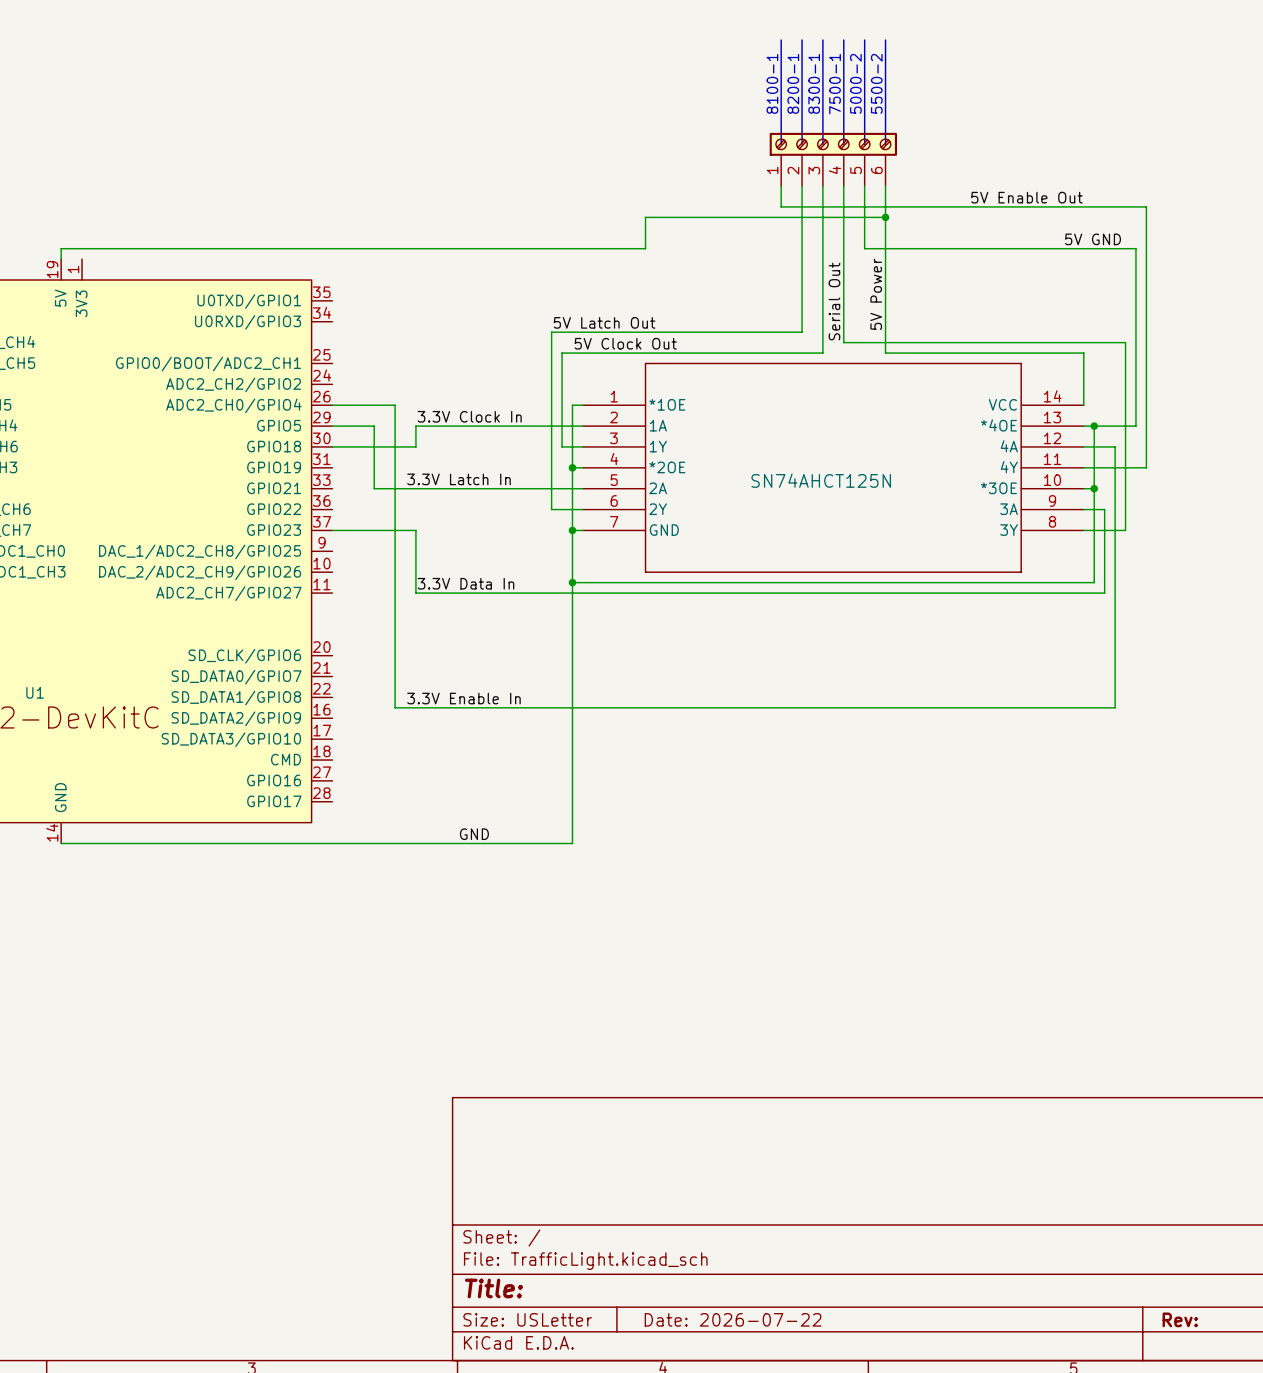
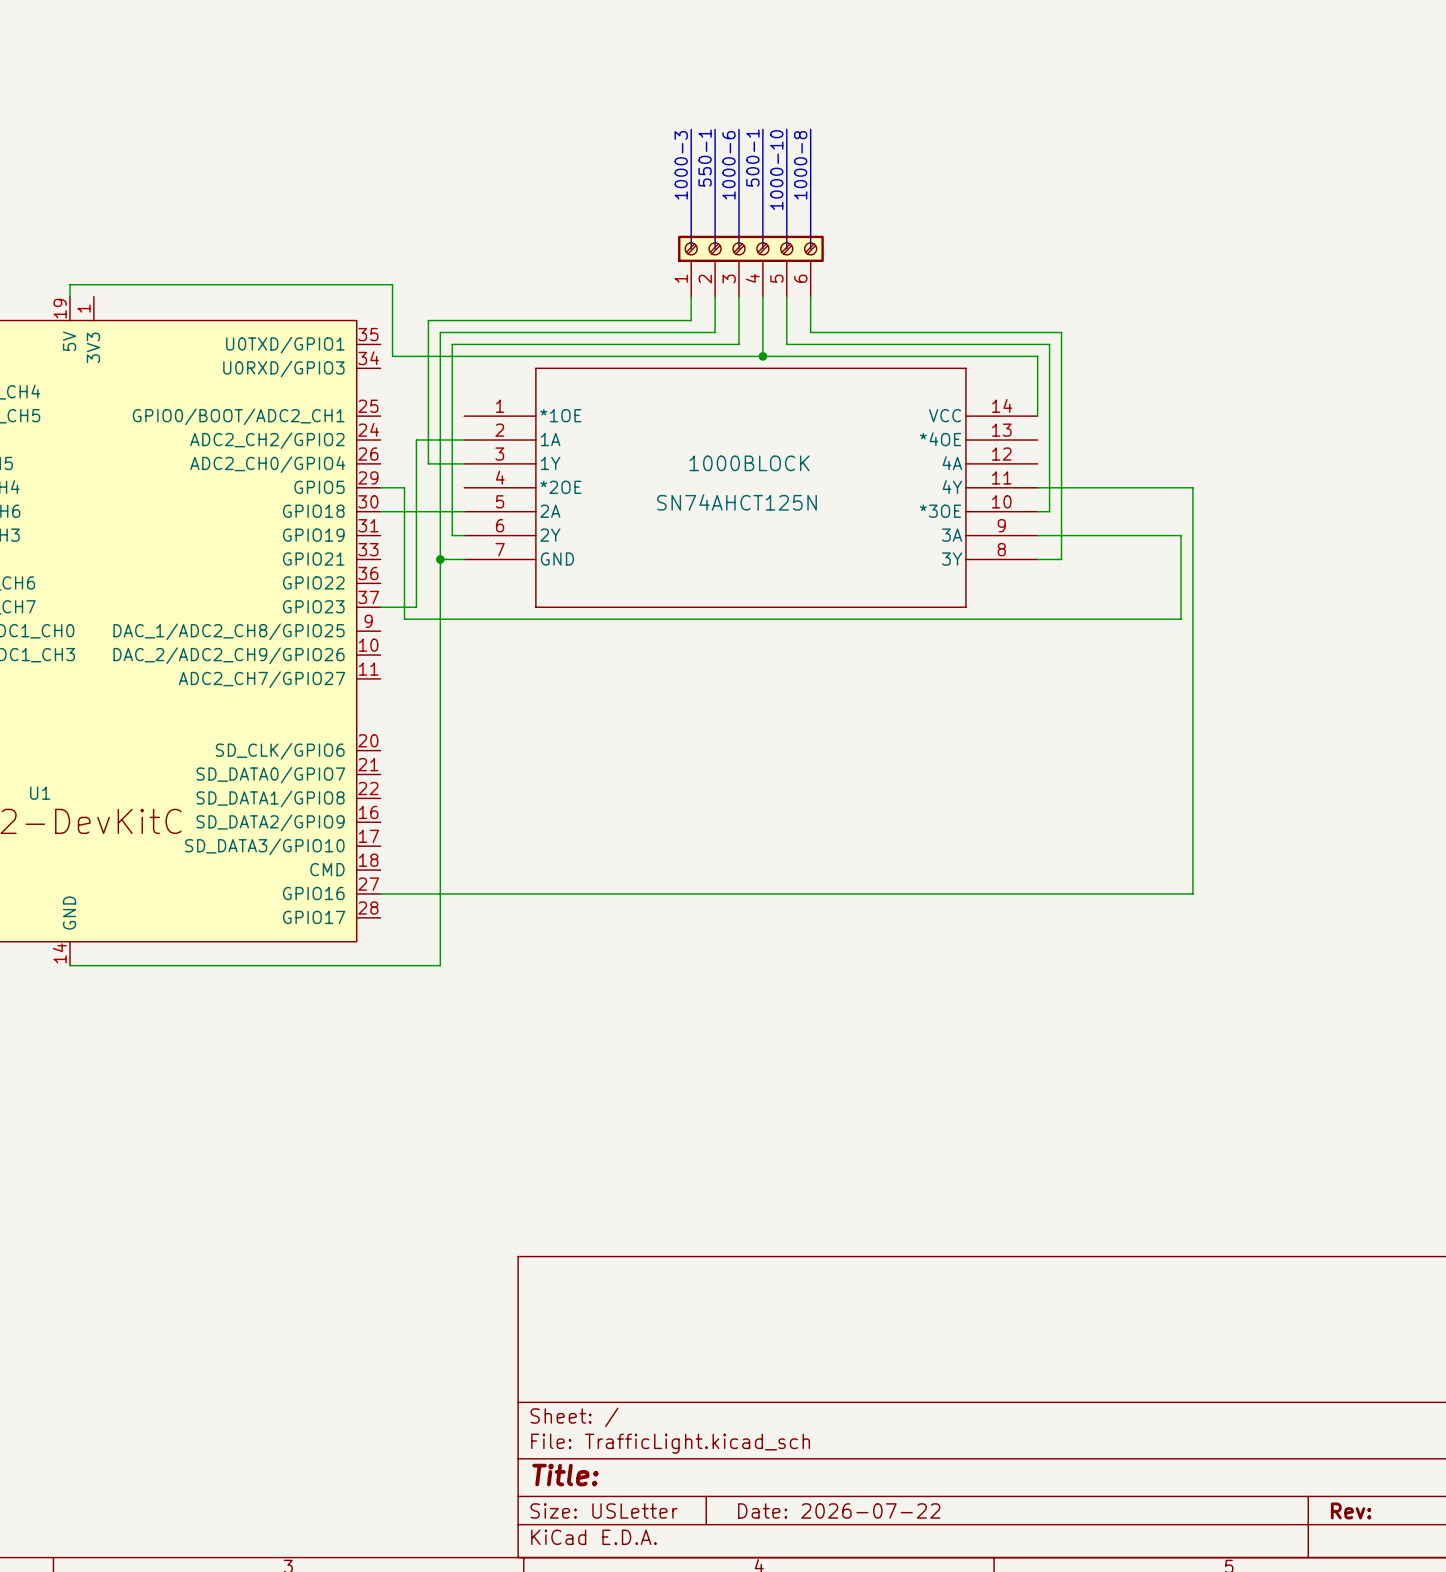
line: (781, 39) (781, 144) -> (691, 129) (691, 248)
line: (802, 39) (802, 144) -> (715, 129) (715, 248)
line: (822, 39) (822, 144) -> (738, 129) (738, 248)
line: (843, 39) (843, 144) -> (762, 129) (762, 248)
line: (864, 39) (864, 144) -> (786, 129) (786, 248)
line: (885, 39) (885, 144) -> (810, 129) (810, 248)
text: 8100-1 (772, 83) -> none
text: 8200-1 (793, 83) -> none
text: 8300-1 (814, 83) -> none
text: 5000-2 (855, 83) -> none
text: 5500-2 (876, 83) -> none
text: 7500-1 (835, 84) -> none
text: none -> 550-1 (705, 158)
text: none -> 500-1 (752, 158)
text: none -> 1000-3 (681, 165)
text: none -> 1000-6 (728, 165)
text: none -> 1000-8 (800, 165)
text: none -> 1000-10 (776, 170)
part position: (833, 159) -> (750, 266)
wire: (781, 186) (781, 206) (1146, 206) (1146, 467) (1083, 467) -> none
wire: (802, 186) (802, 332) (551, 332) (551, 509) (582, 509) -> none
wire: (822, 186) (822, 353) (562, 353) (562, 446) (582, 446) -> none
wire: (843, 186) (843, 342) (1125, 342) (1125, 530) (1083, 530) -> none
wire: (864, 186) (864, 248) (1135, 248) (1135, 426) (1083, 426) -> none
wire: (885, 186) (885, 353) (1083, 353) (1083, 405) -> none
label: 5V Enable Out (1026, 197) -> none
wire: (885, 217) (645, 217) (645, 248) (342, 248) -> (1037, 416) (1037, 356) (392, 356) (392, 284)
junction: (885, 217) -> none
label: 5V GND (1093, 239) -> none
wire: none -> (738, 296) (738, 344) (452, 344) (452, 463) (464, 463)
wire: none -> (762, 296) (762, 356)
wire: none -> (786, 296) (786, 344) (1049, 344) (1049, 511) (1037, 511)
wire: none -> (810, 296) (810, 332) (1061, 332) (1061, 559) (1037, 559)
label: 5V Power (876, 294) -> none
label: Serial Out (834, 301) -> none
junction: none -> (762, 356)
label: 5V Latch Out (604, 322) -> none
label: 5V Clock Out (625, 343) -> none
wire: (332, 405) (374, 405) -> (691, 296) (691, 320) (428, 320) (428, 463)
wire: (582, 405) (572, 405) (572, 843) (384, 843) -> (715, 296) (715, 332) (440, 332) (440, 965)
label: 3.3V Clock In (469, 416) -> none
wire: (353, 426) (374, 426) (374, 488) (384, 488) -> (404, 487) (404, 619) (1180, 619) (1180, 535) (1037, 535)
wire: (582, 426) (415, 426) (415, 446) (405, 446) -> none
1000BLOCK: none -> SN74AHCT125N (750, 487)
wire: none -> (1037, 487) (1192, 487) (1192, 893) (380, 893)
wire: (1094, 426) (1094, 582) (572, 582) -> none
junction: (1094, 426) -> none
wire: (1083, 446) (1115, 446) (1115, 707) (395, 707) (395, 467) -> (464, 535) (452, 535)
wire: (572, 467) (582, 467) -> none
junction: (572, 467) -> none
part: SN74AHCT125N (833, 467) -> none
label: 3.3V Latch In (459, 479) -> none
junction: none -> (440, 559)
wire: (405, 488) (582, 488) -> none
wire: (1083, 488) (1094, 488) -> none
junction: (1094, 488) -> none
wire: (1083, 509) (1104, 509) (1104, 593) (415, 593) (415, 530) (363, 530) -> (464, 440) (416, 440) (416, 607)
junction: (572, 530) -> none
junction: (572, 582) -> none
label: 3.3V Data In (465, 583) -> none
label: 3.3V Enable In (463, 698) -> none
label: GND (474, 834) -> none

